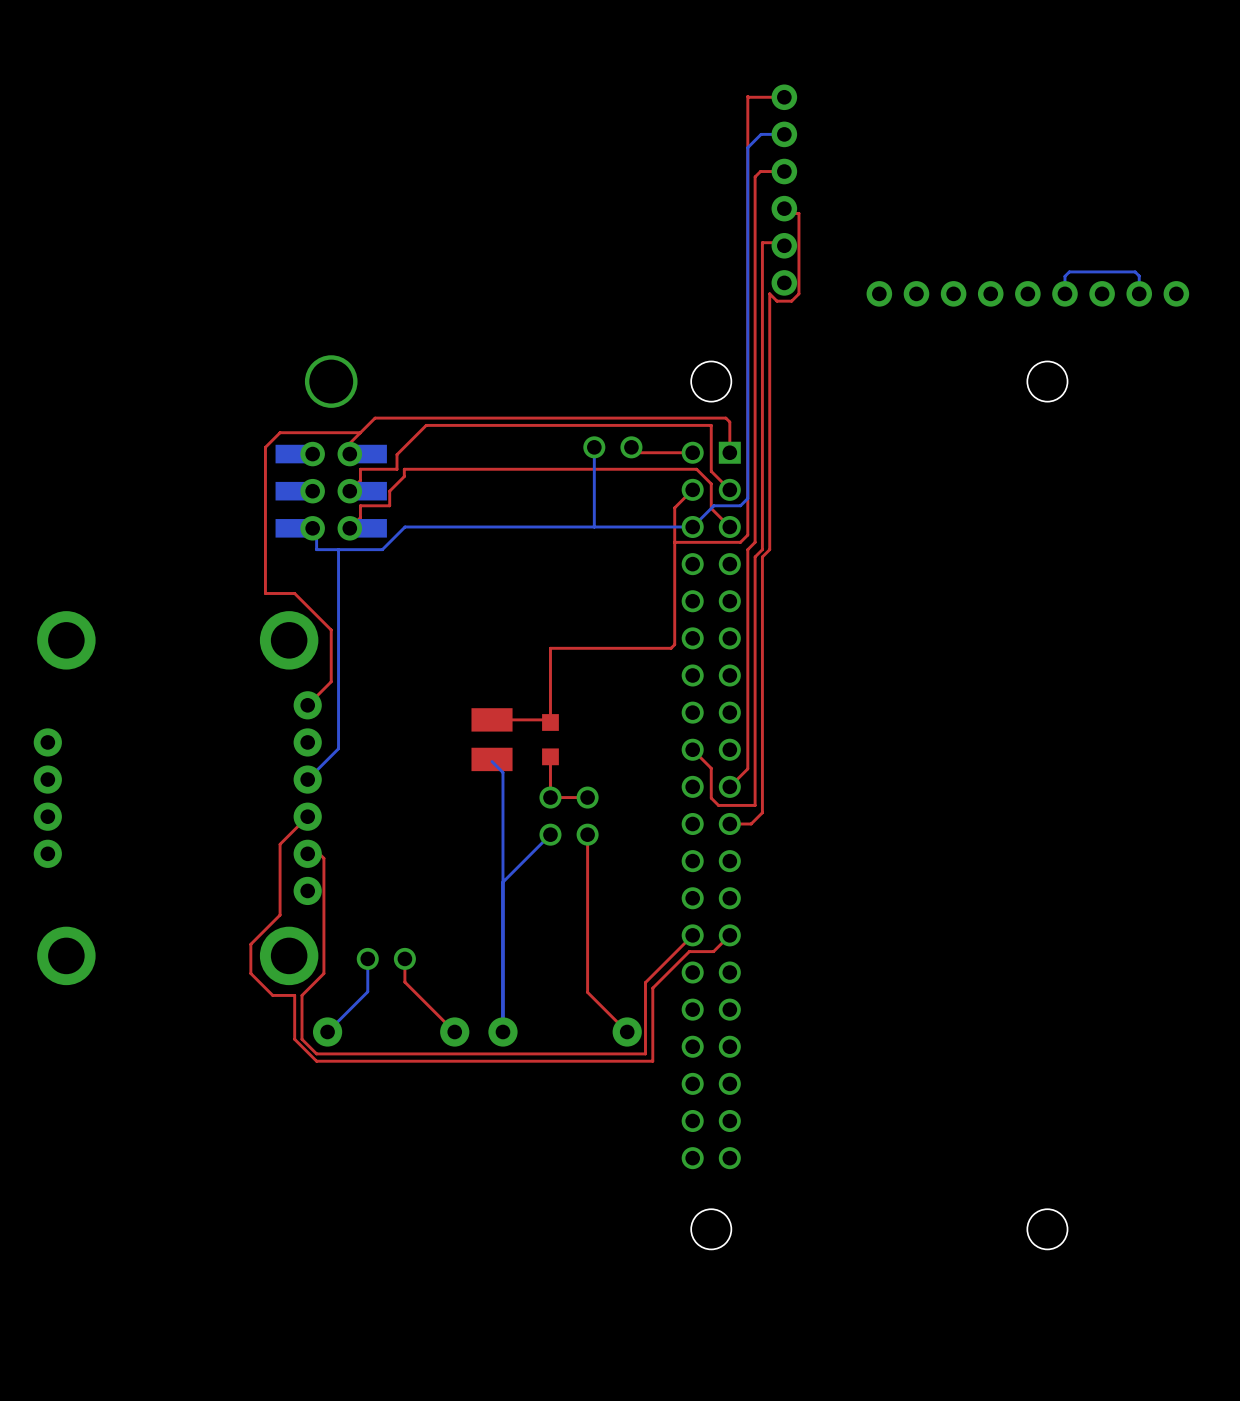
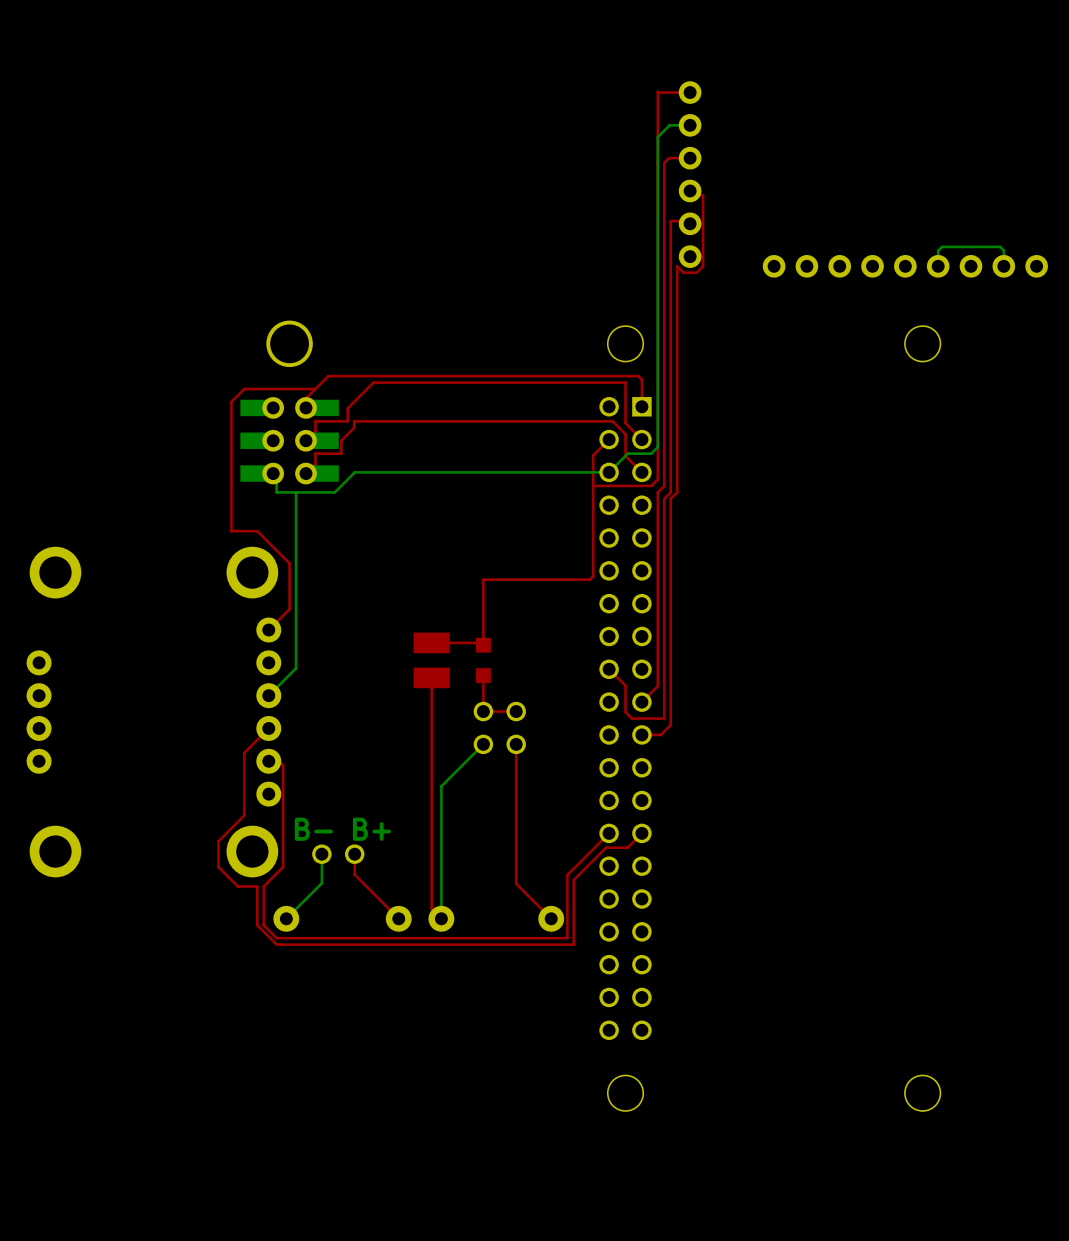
bottom track: (594, 447) (594, 526) -> none
part: (594, 447) -> none
top track: (631, 447) (636, 452) (692, 452) -> none
part: (631, 447) -> none
top track: none -> (431, 677) (431, 909) (441, 918)
bottom track: (492, 761) (502, 772) (502, 882) -> none
text: none -> B- (313, 829)
text: none -> B+ (371, 829)

